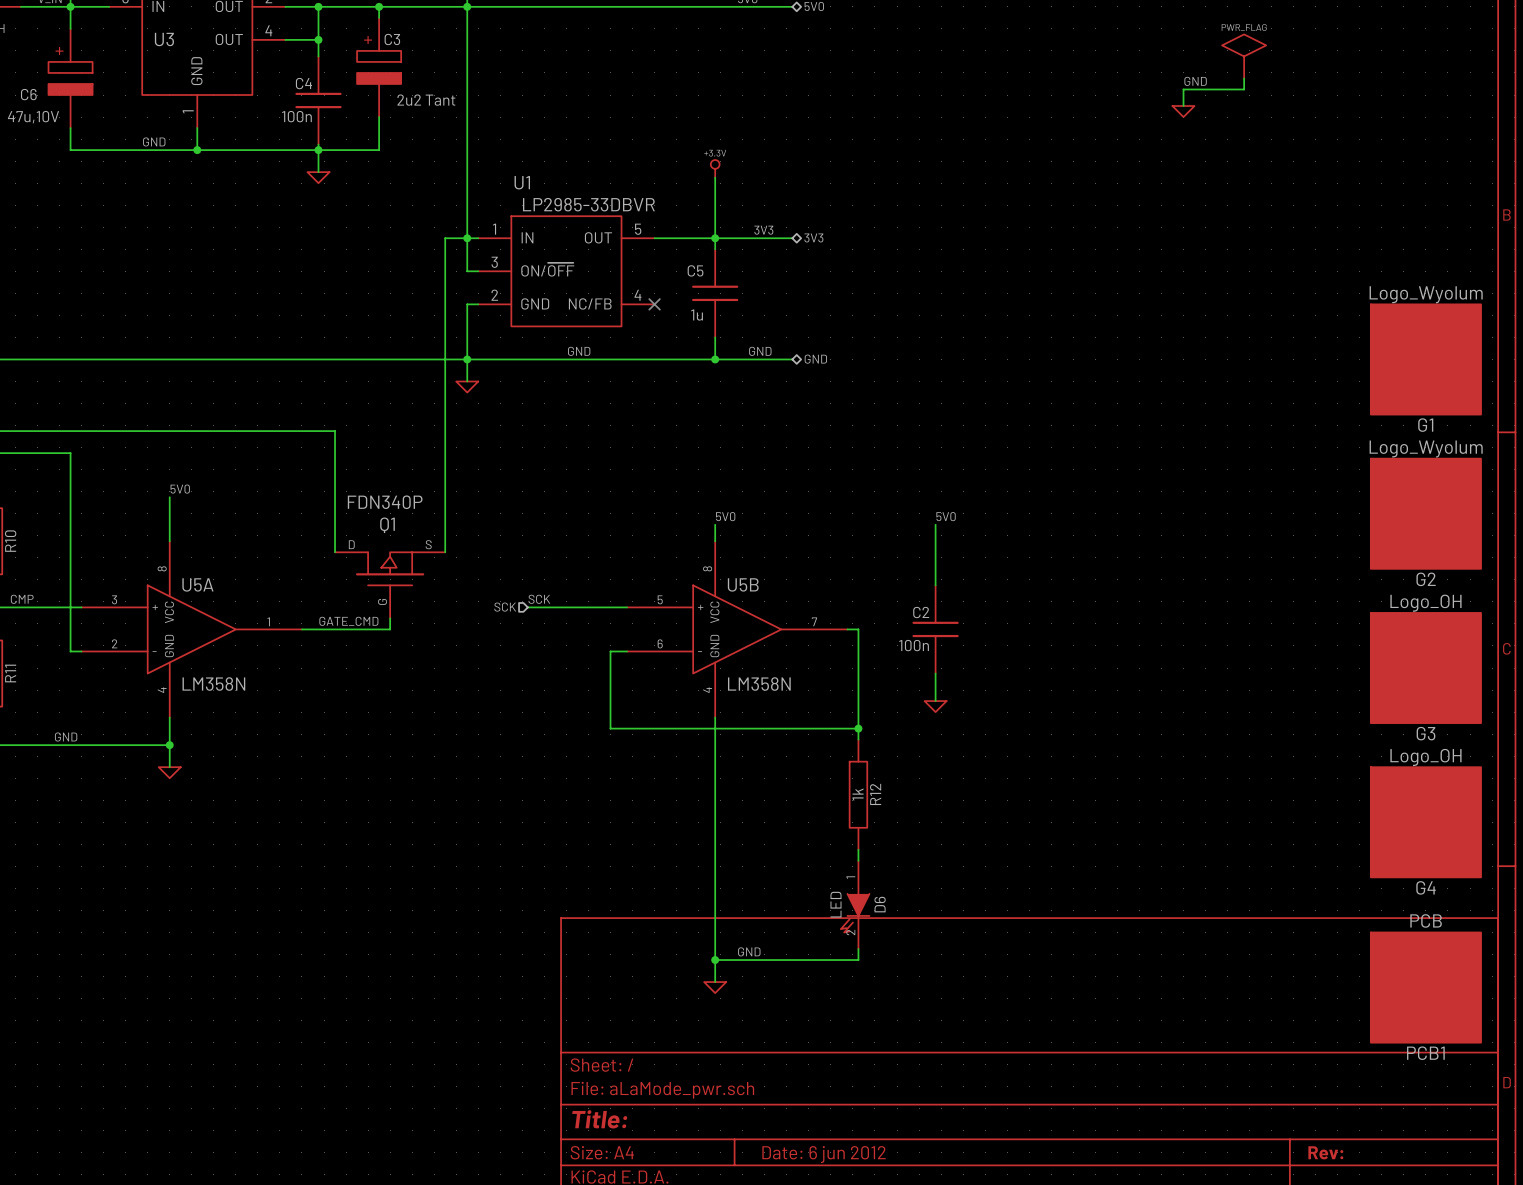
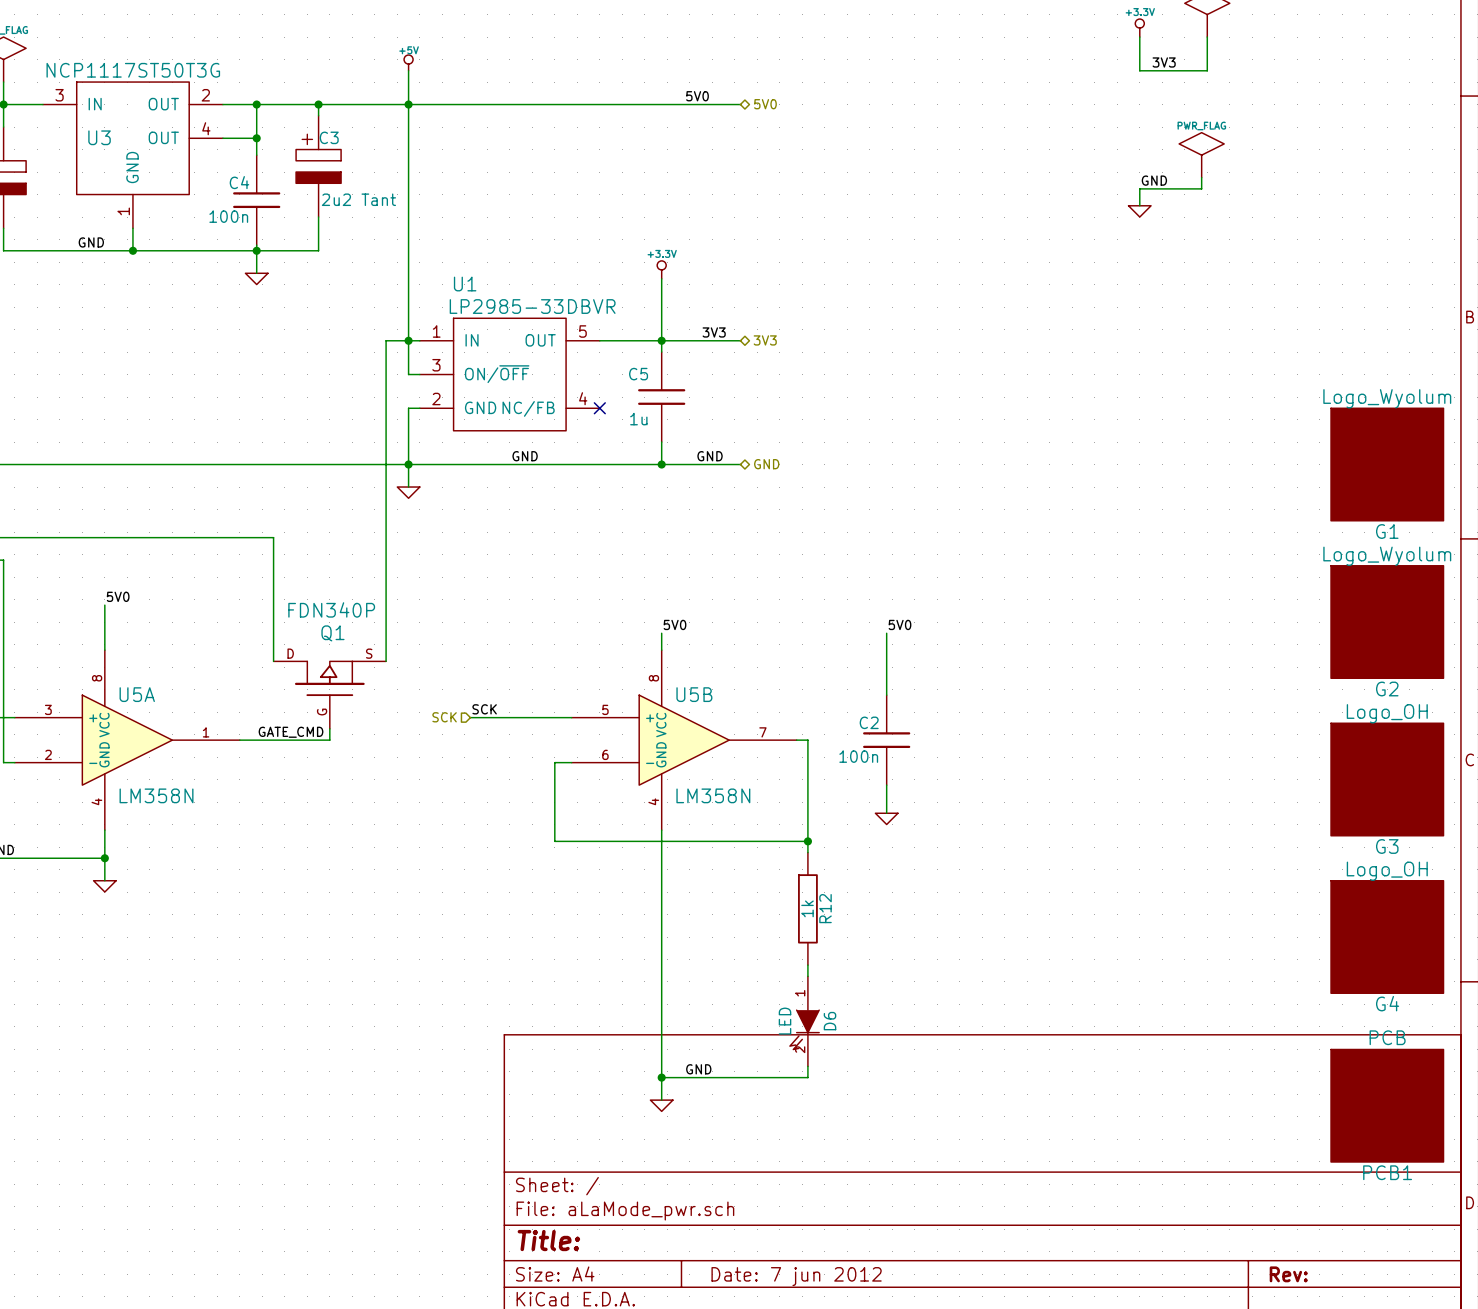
title block: Date: 6 jun 2012 (824, 1154) -> Date: 7 jun 2012 (796, 1276)

